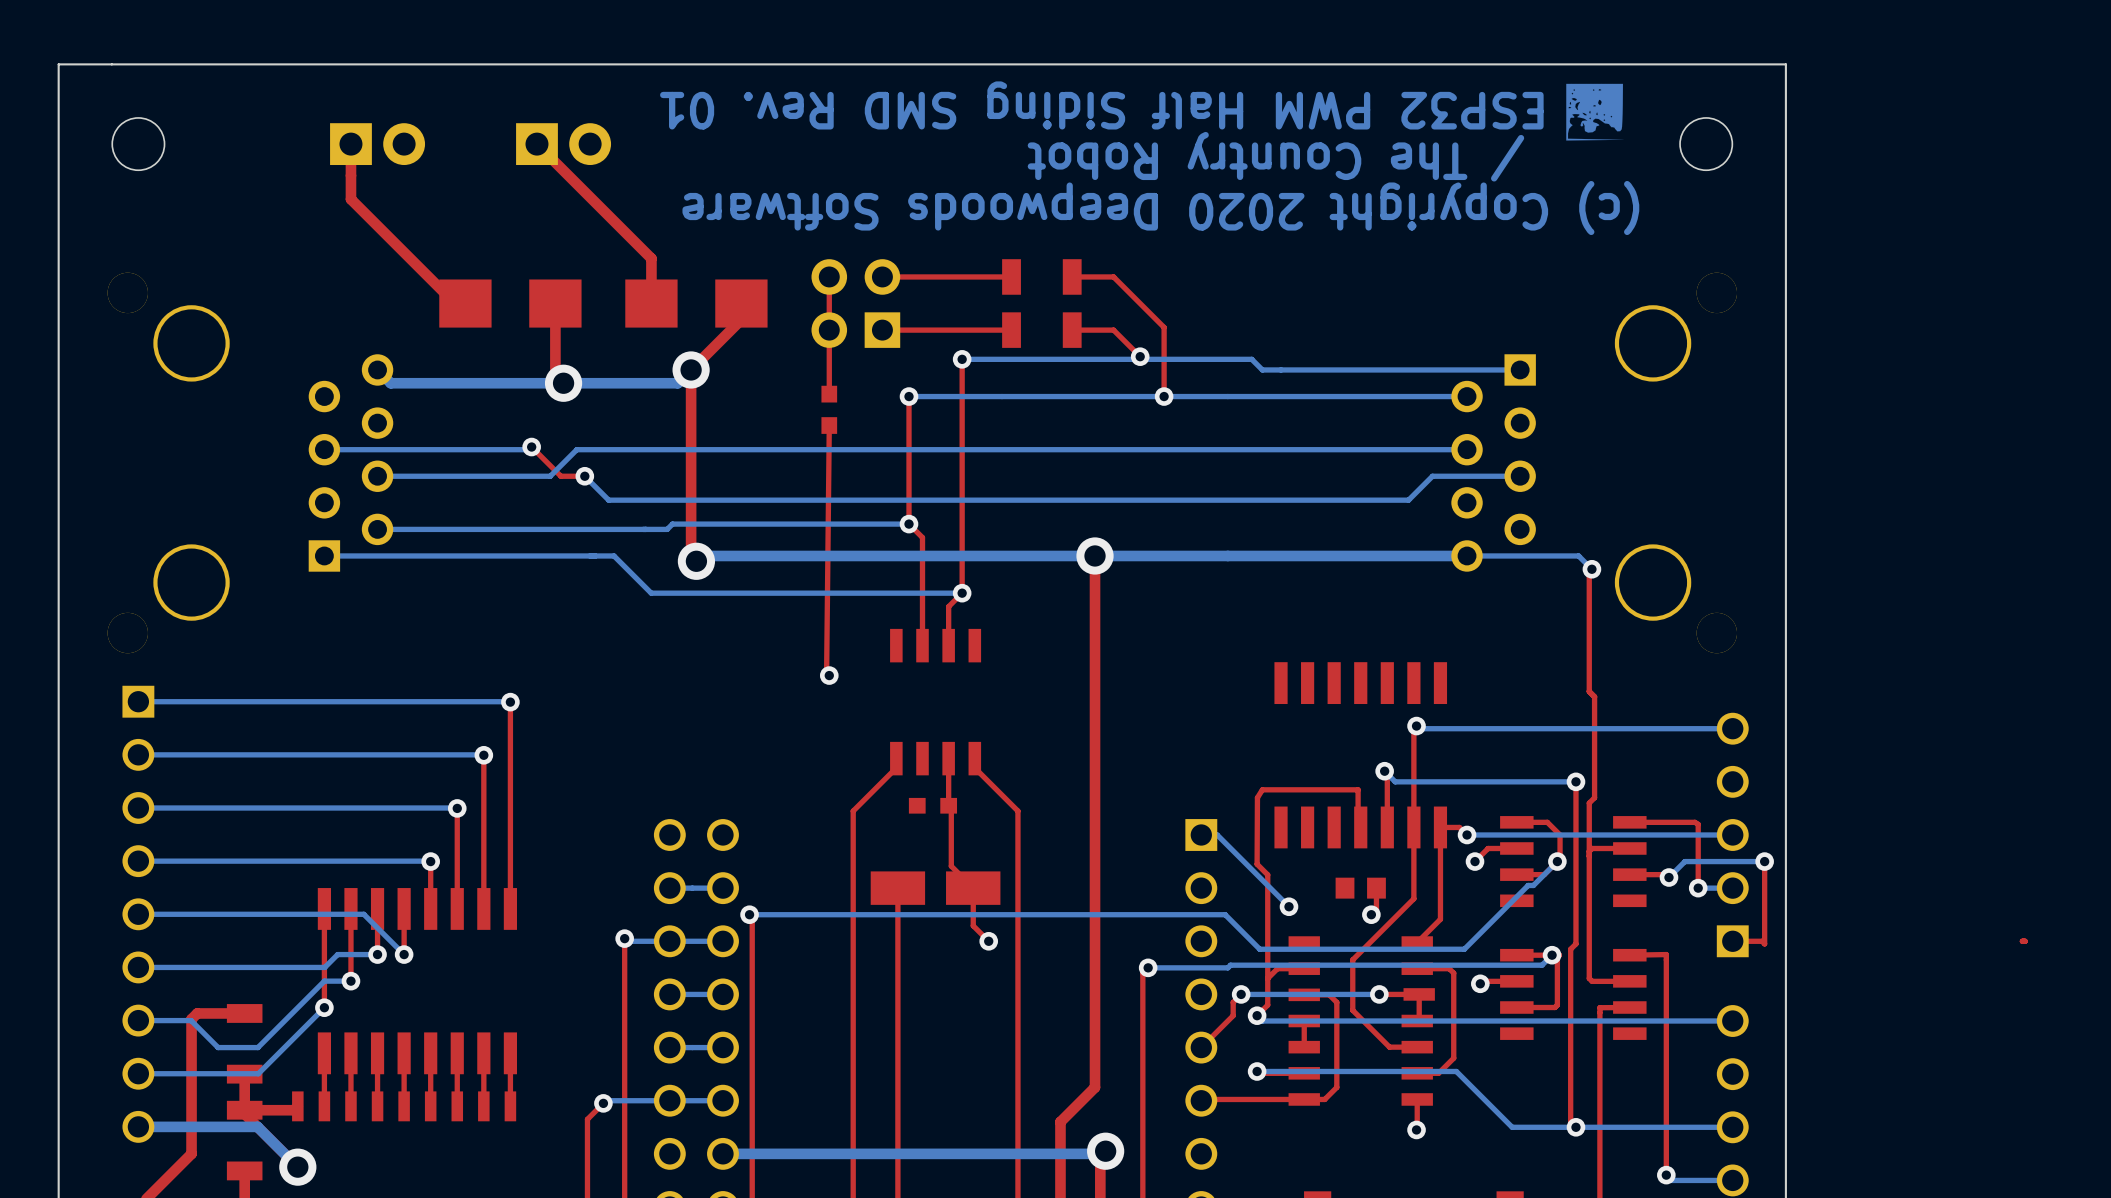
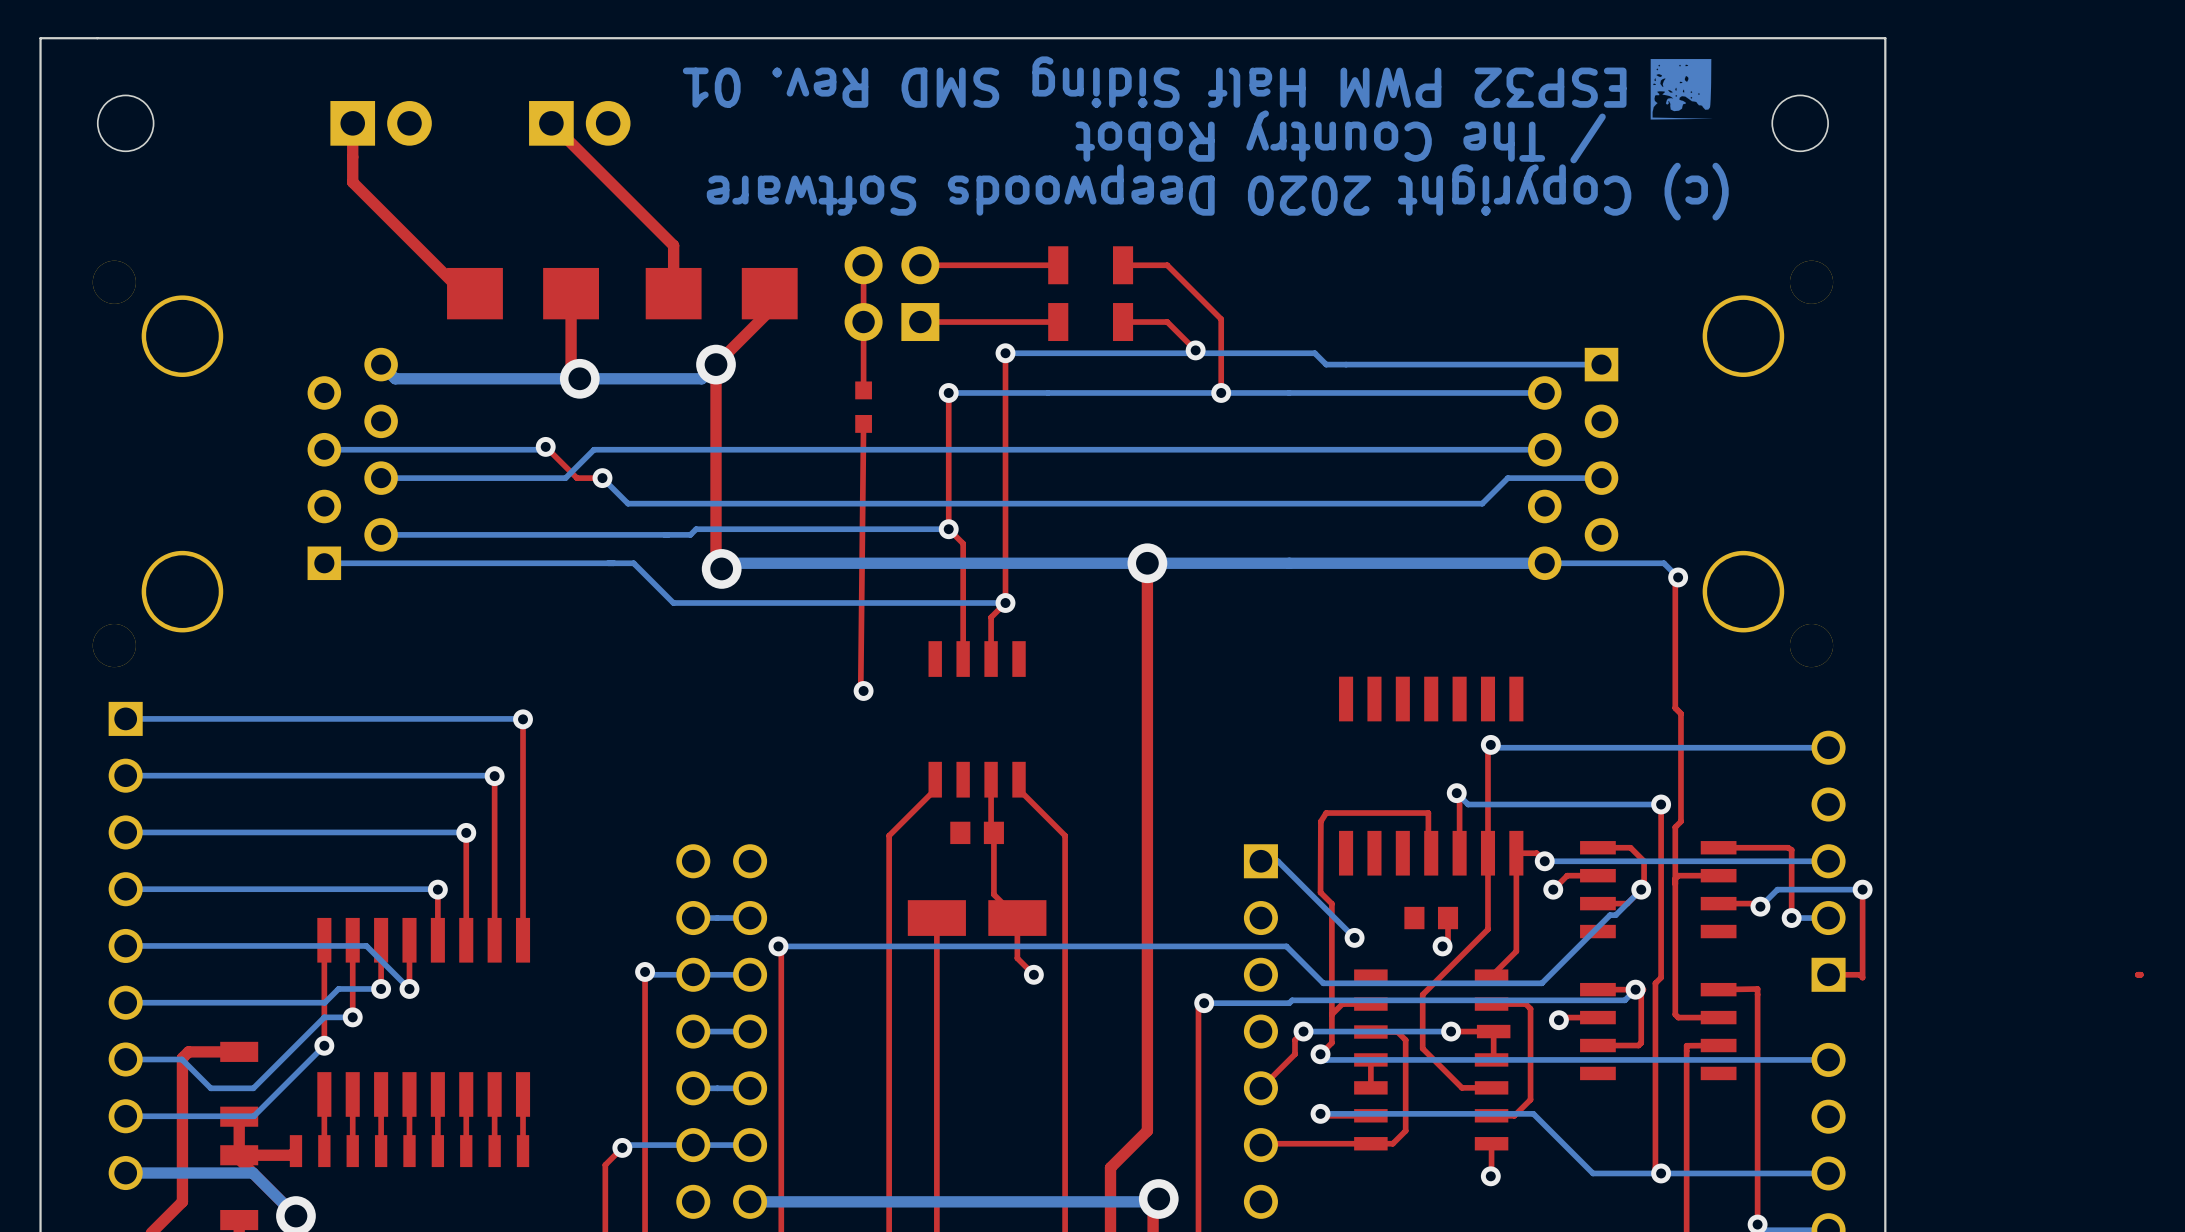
part footprint: [908, 797, 958, 814] -> [950, 821, 1004, 845]

